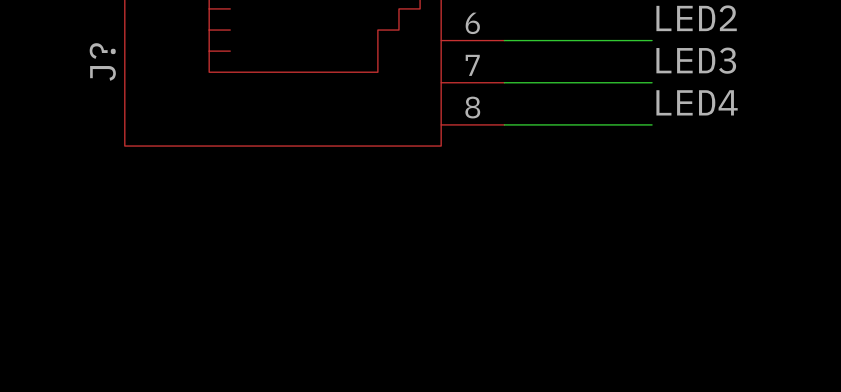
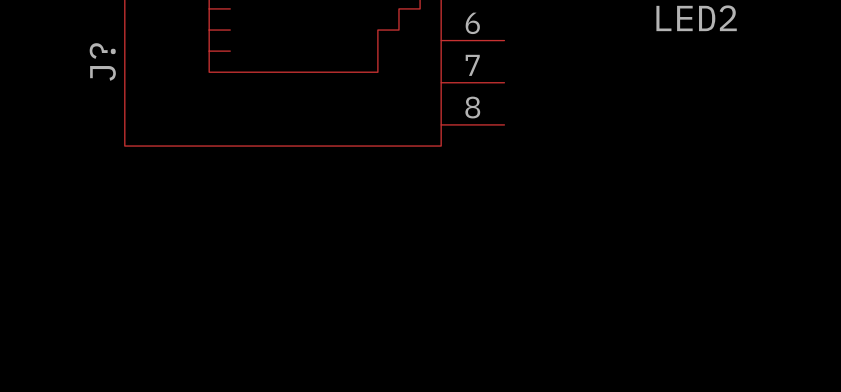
wire: (504, 40) (652, 40) -> none
label: LED3 (696, 60) -> none
wire: (504, 82) (652, 82) -> none
label: LED4 (697, 102) -> none
wire: (504, 124) (652, 124) -> none

